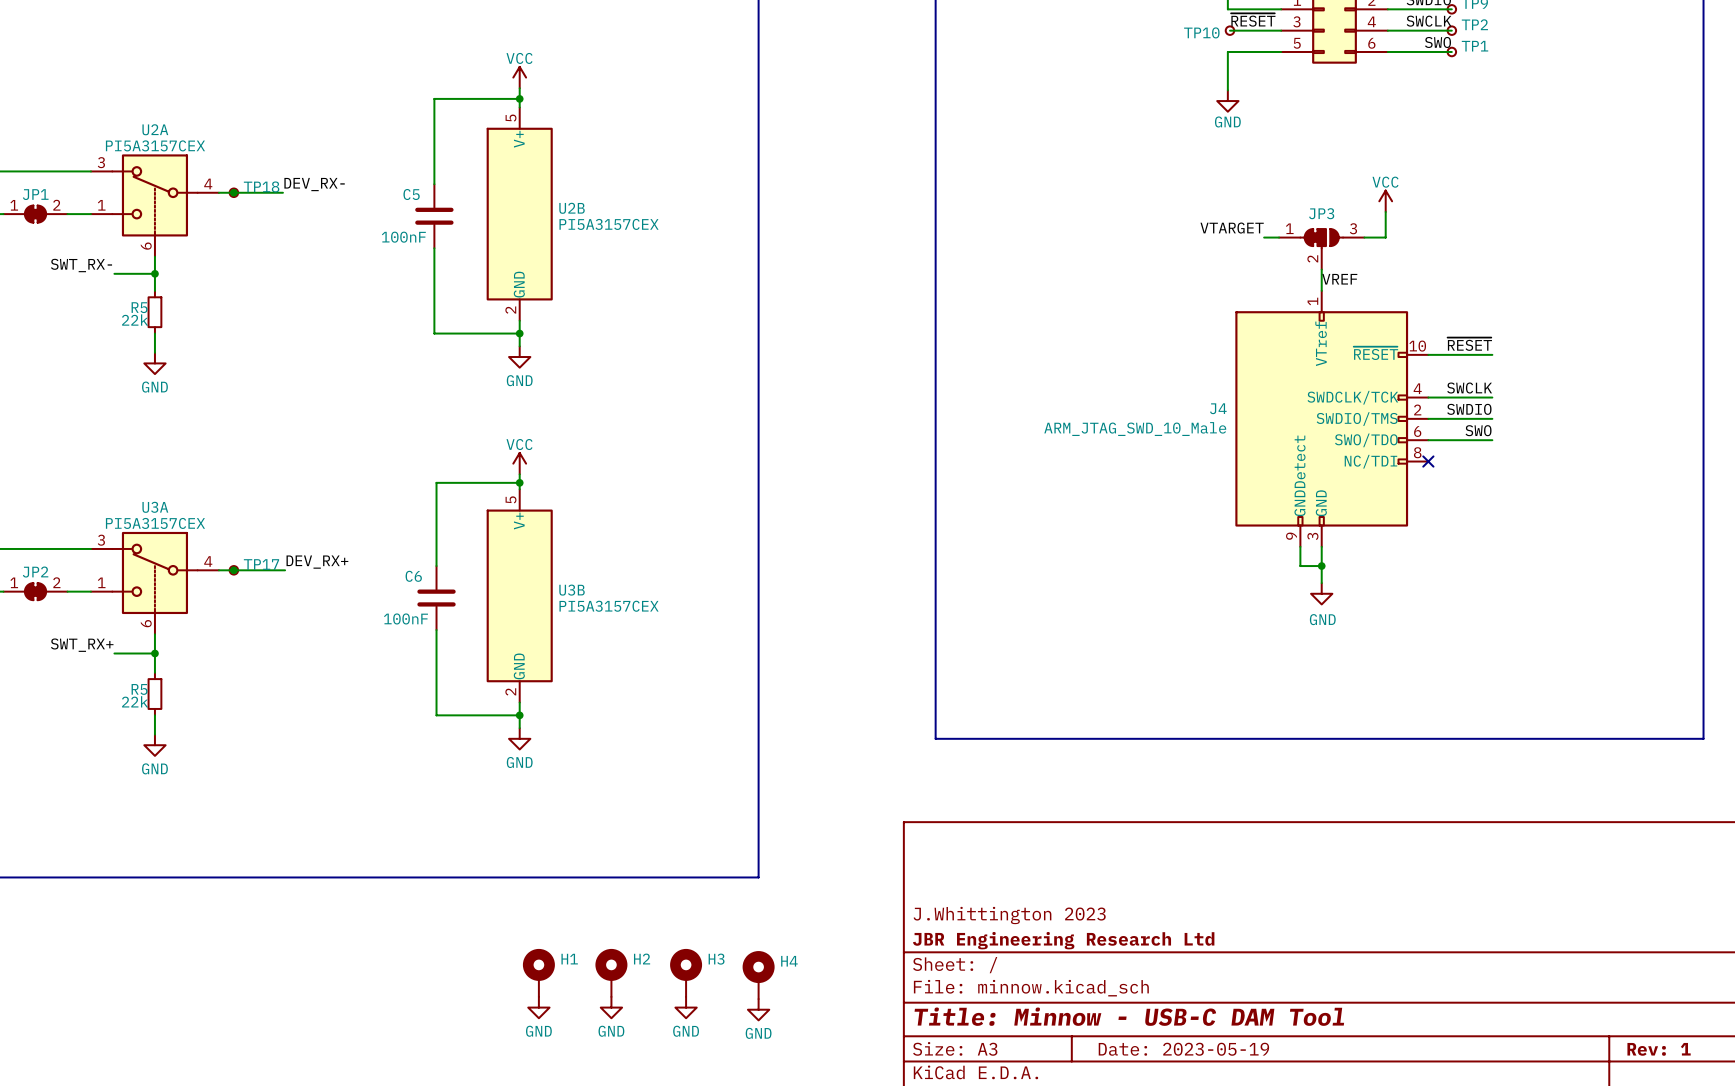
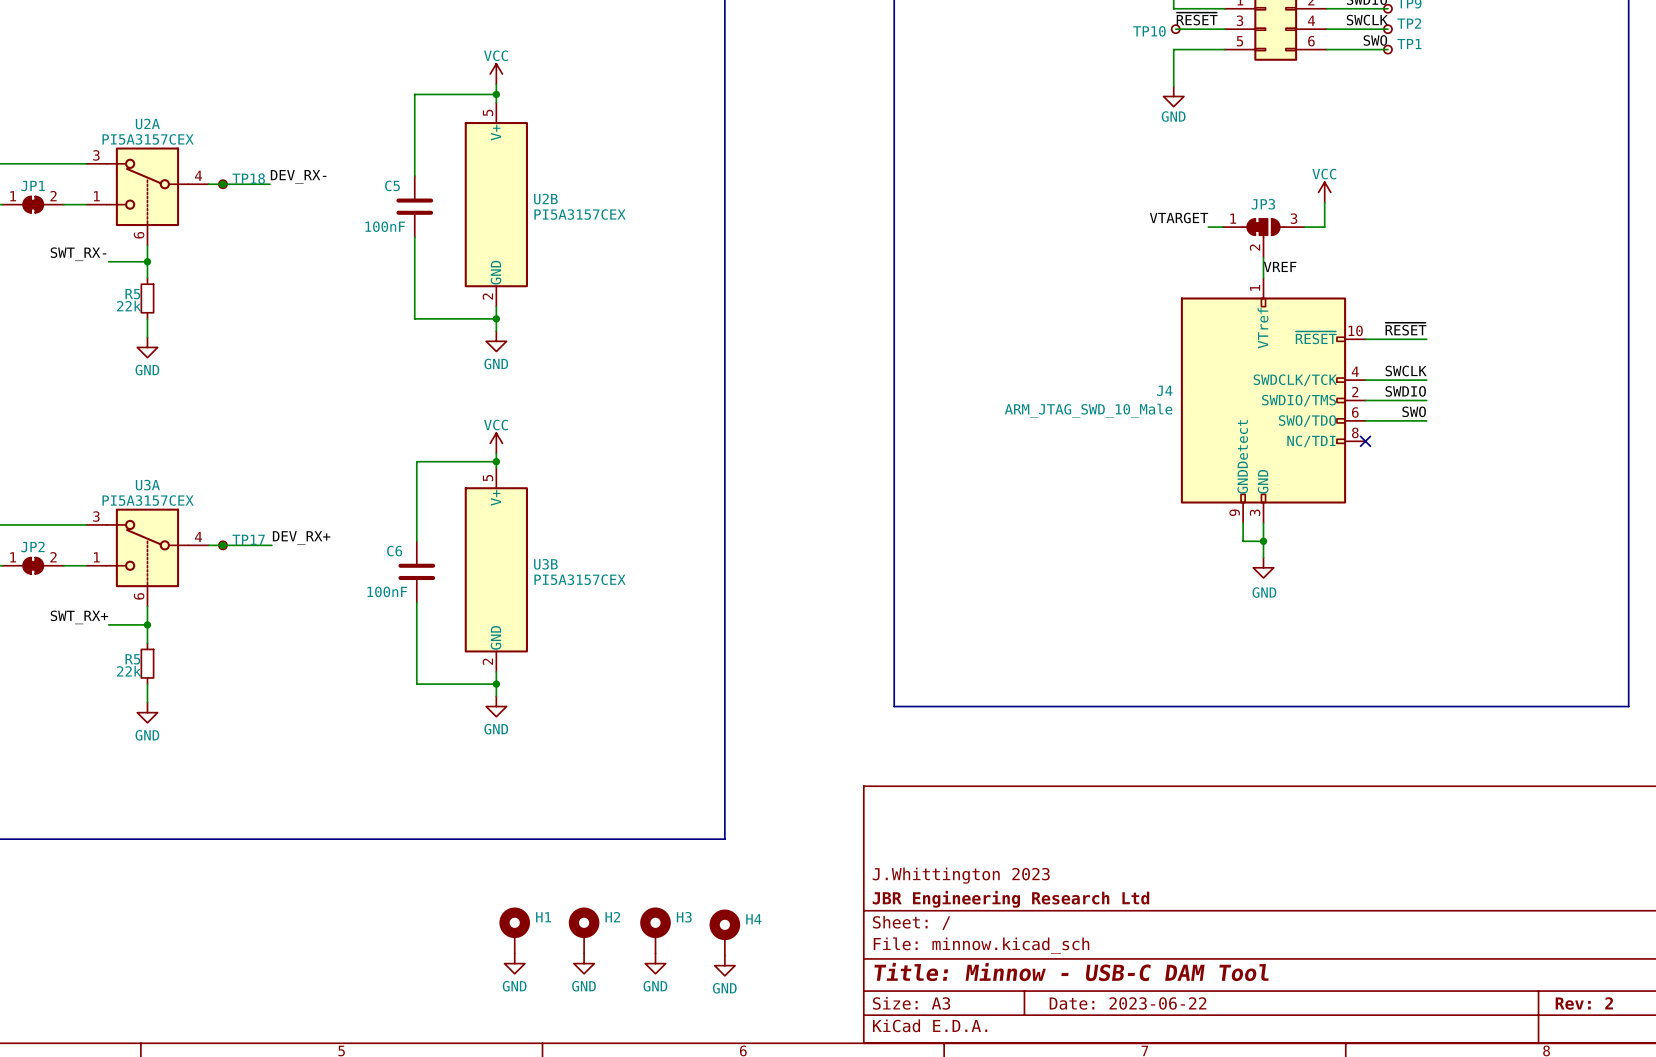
title block: Date: 2023-05-19 (1183, 1049) -> Date: 2023-06-22 (1128, 1003)
title block: Rev: 1 (1659, 1049) -> Rev: 2 (1584, 1003)

